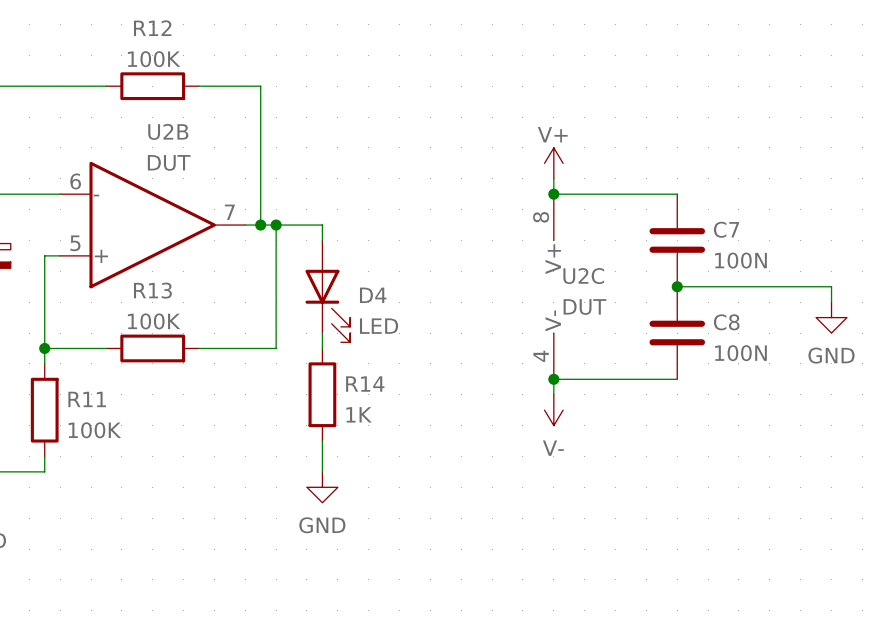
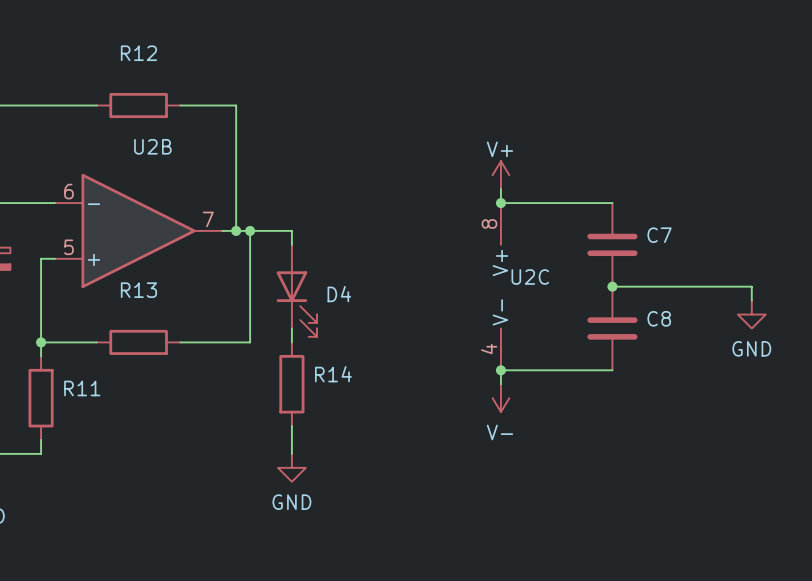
R12 value: 100K (154, 59) -> none
U2B value: DUT (169, 162) -> none
C7 value: 100N (740, 260) -> none
U2C value: DUT (584, 307) -> none
R13 value: 100K (154, 321) -> none
D4 value: LED (379, 326) -> none
C8 value: 100N (740, 353) -> none
R14 value: 1K (359, 414) -> none
R11 value: 100K (94, 430) -> none

